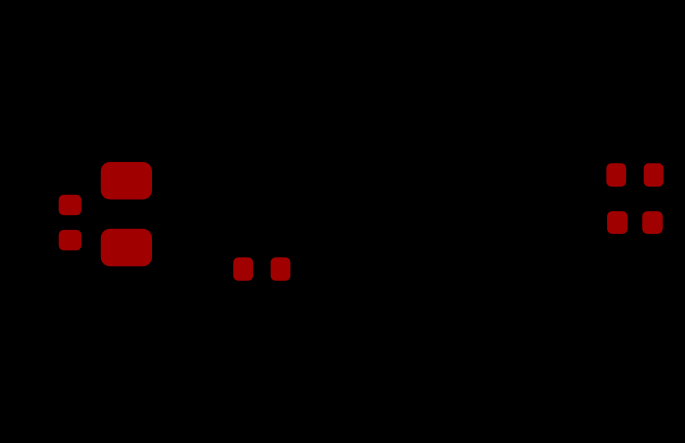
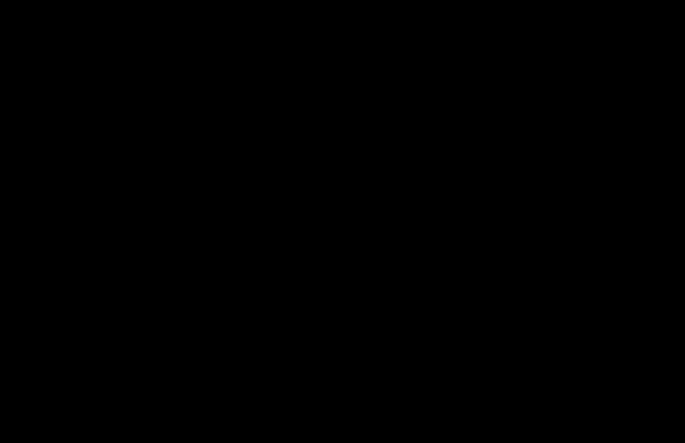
part: (634, 174) -> none
part: (126, 214) -> none
part: (70, 222) -> none
part: (634, 222) -> none
part: (261, 269) -> none

